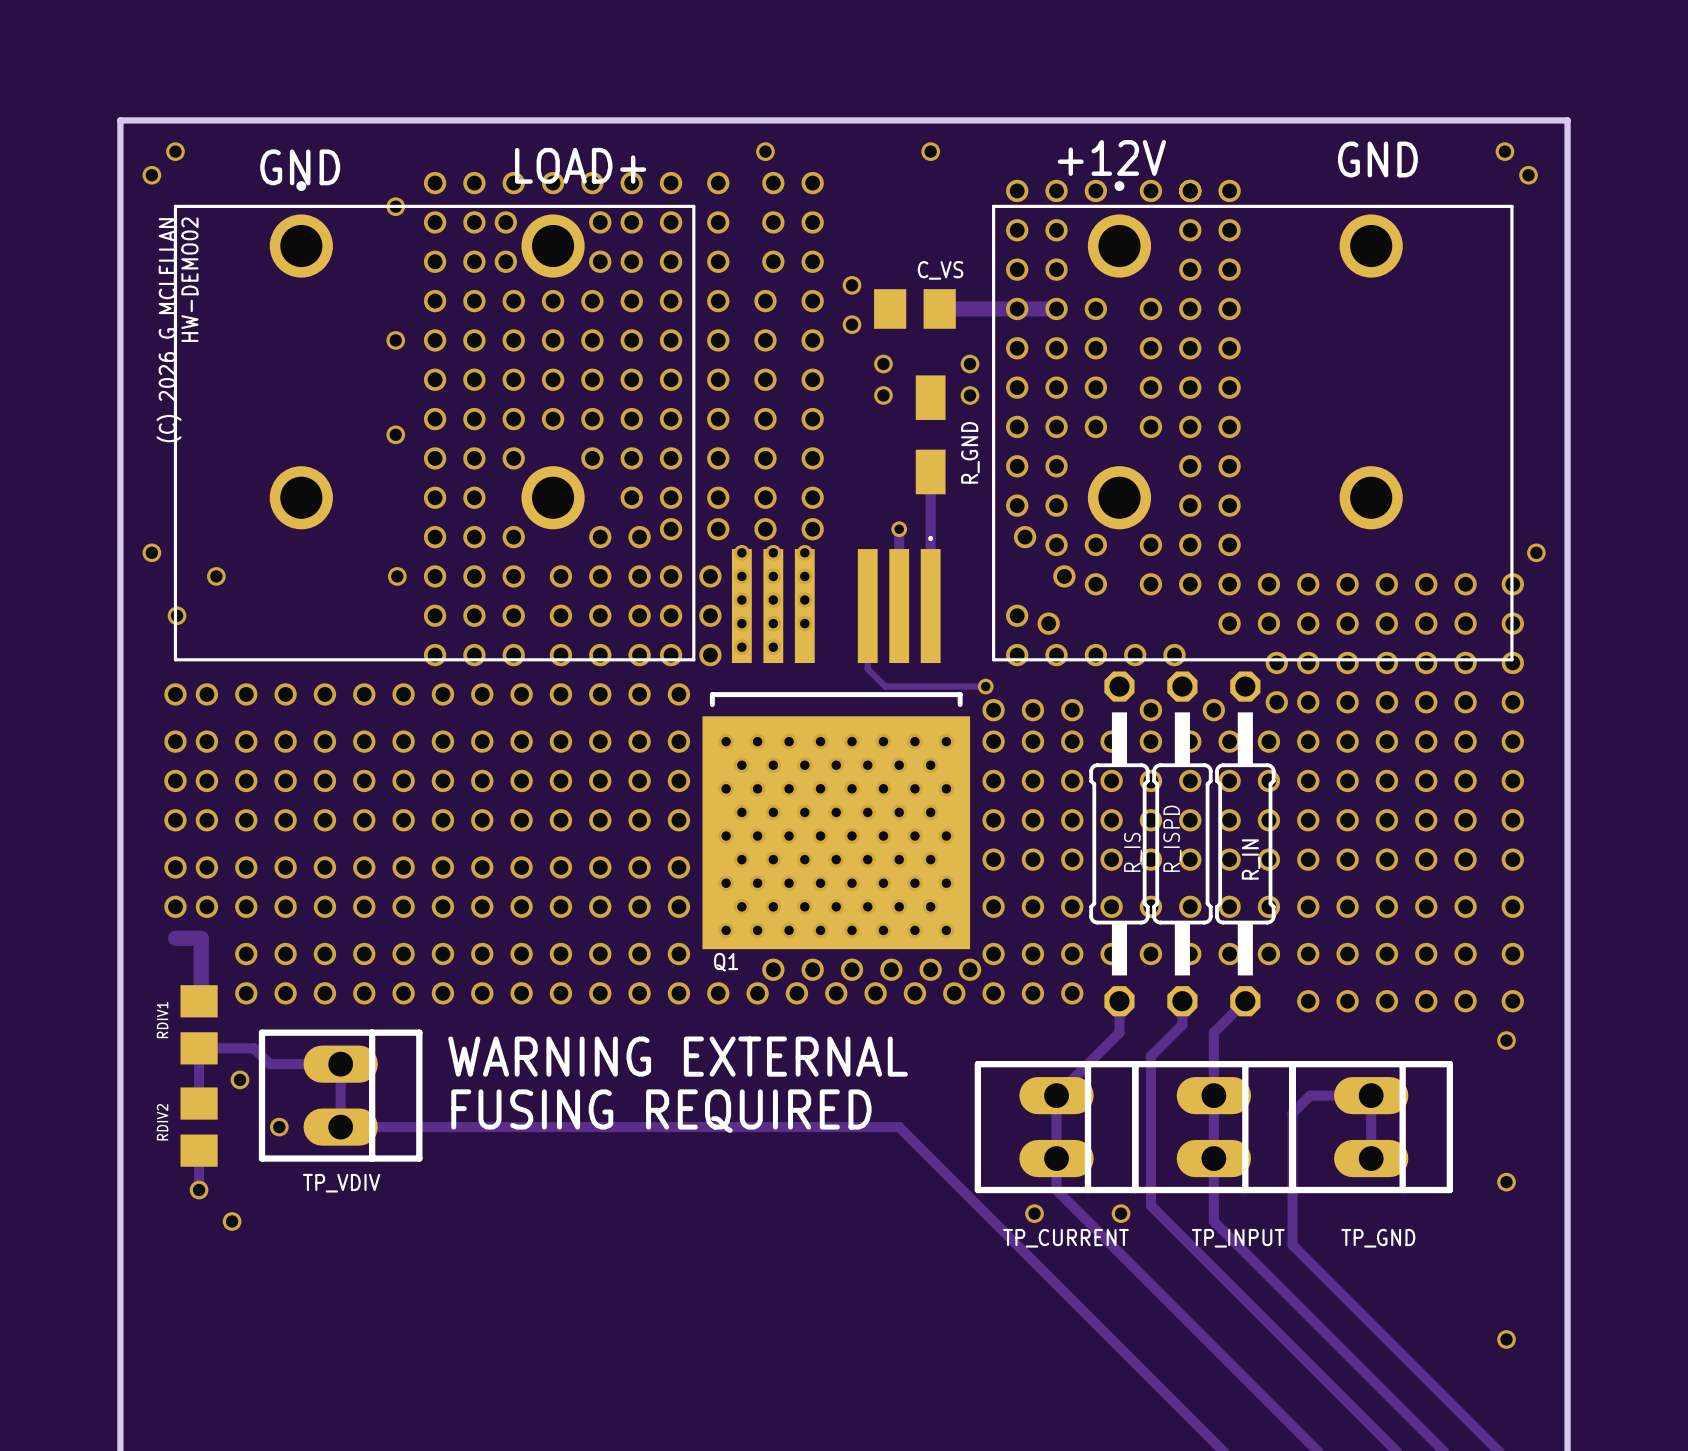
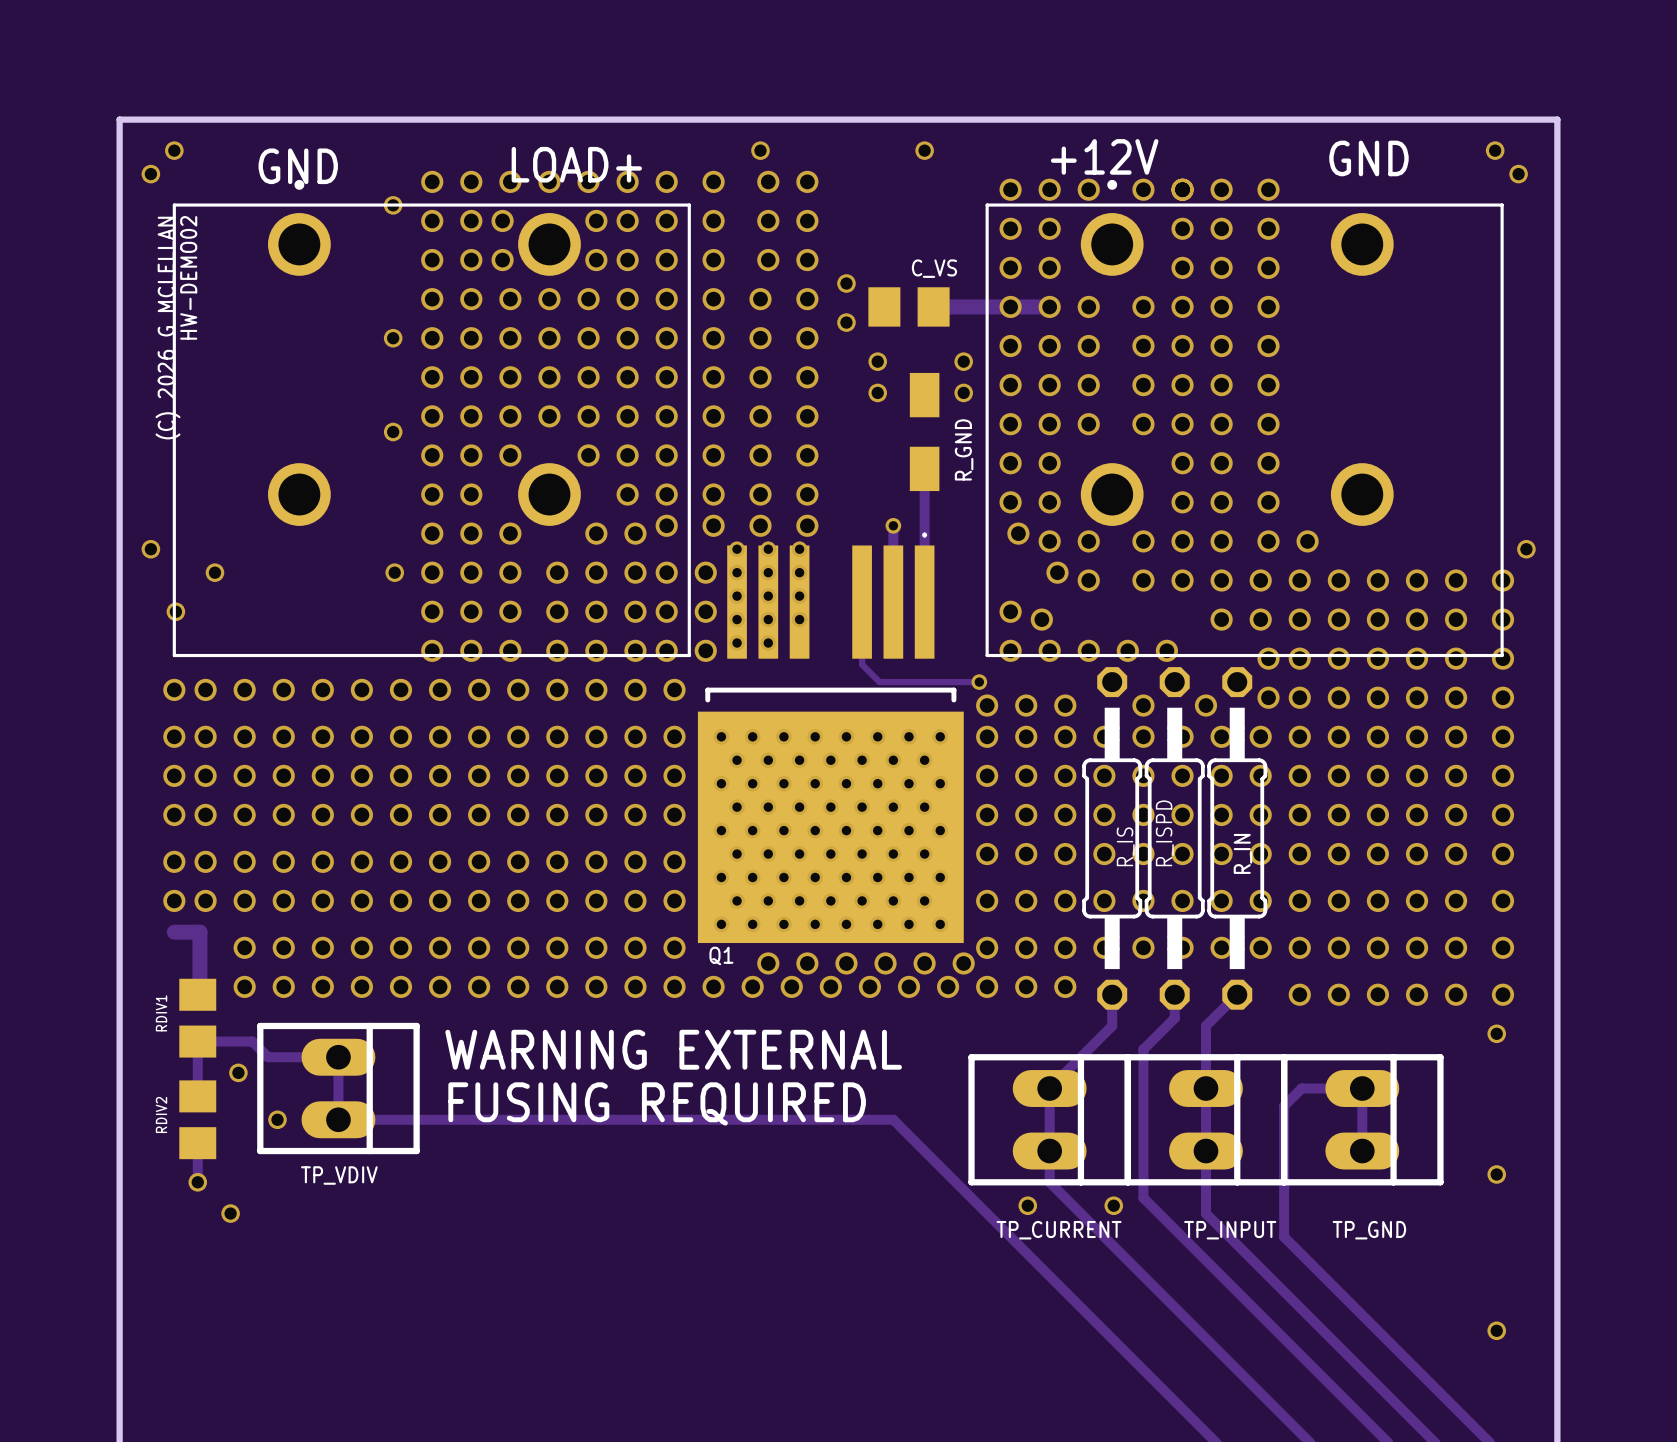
via: none -> (1268, 189)
via: none -> (1268, 228)
via: none -> (1268, 267)
via: none -> (1268, 306)
via: none -> (1268, 346)
via: none -> (1268, 385)
via: none -> (1268, 424)
via: none -> (1268, 463)
via: none -> (1268, 502)
via: none -> (1268, 541)
via: none -> (1307, 541)

